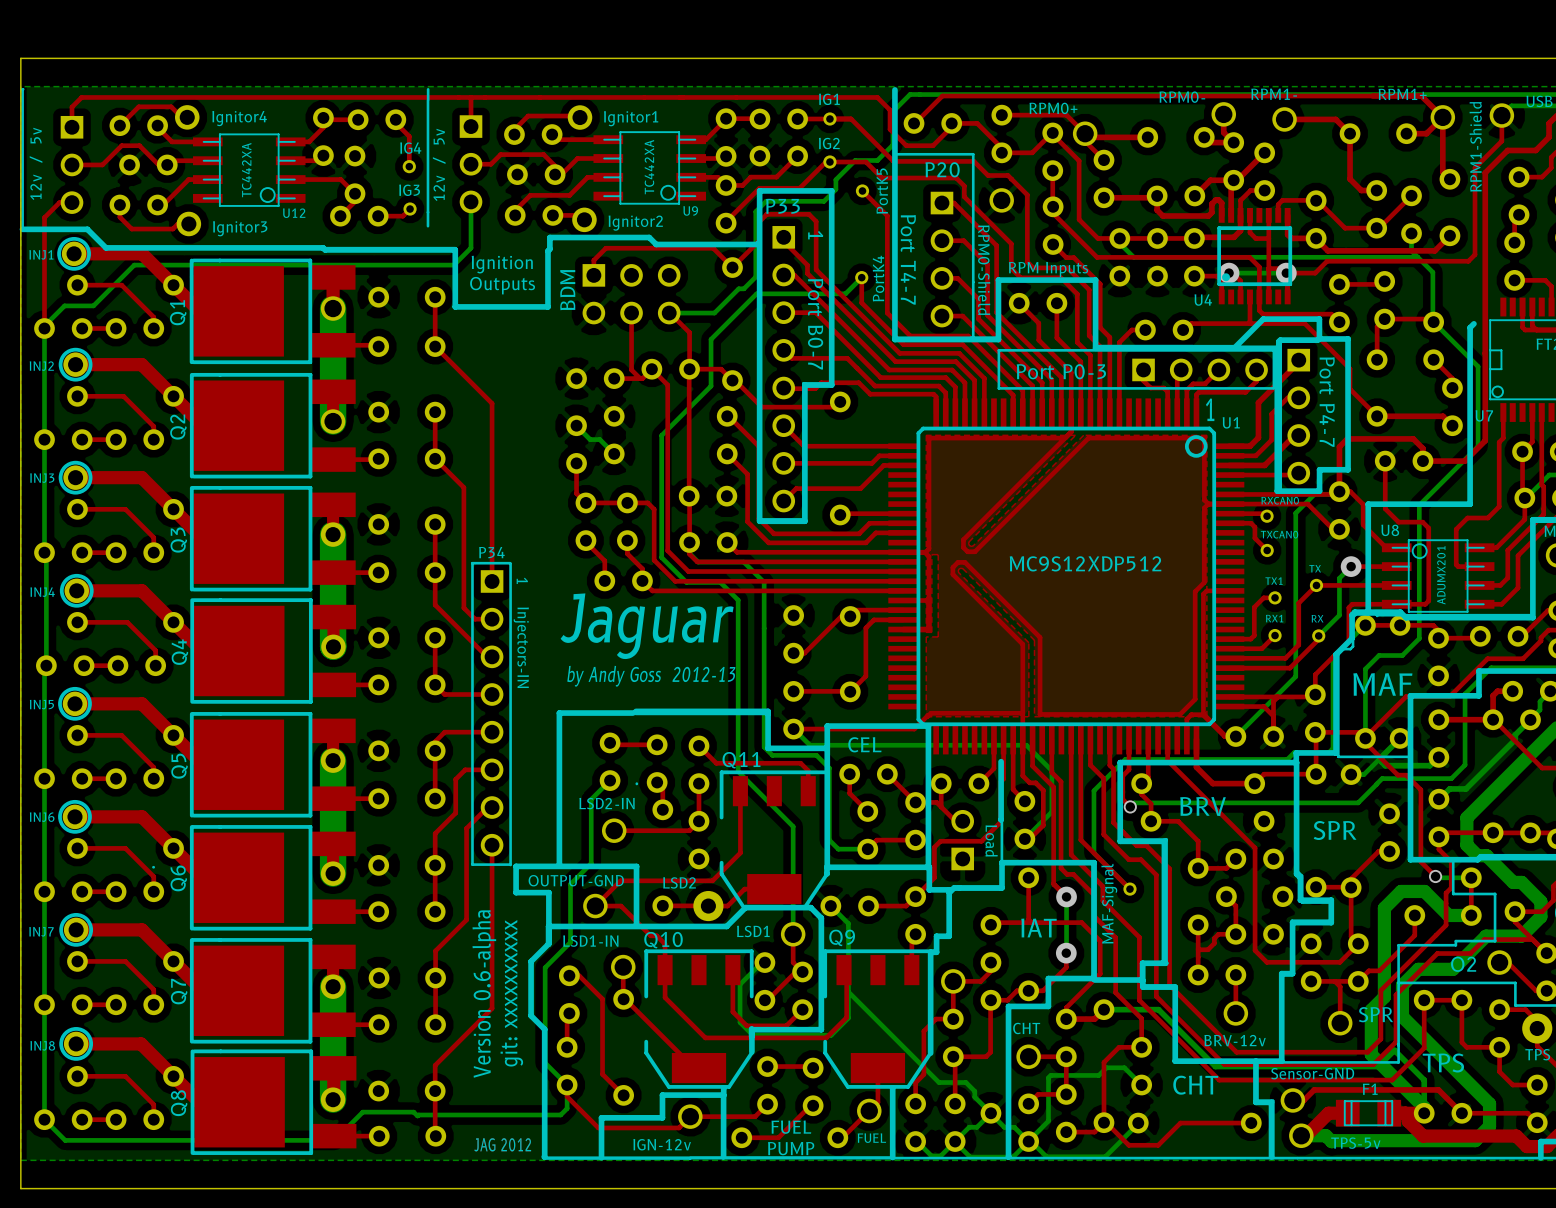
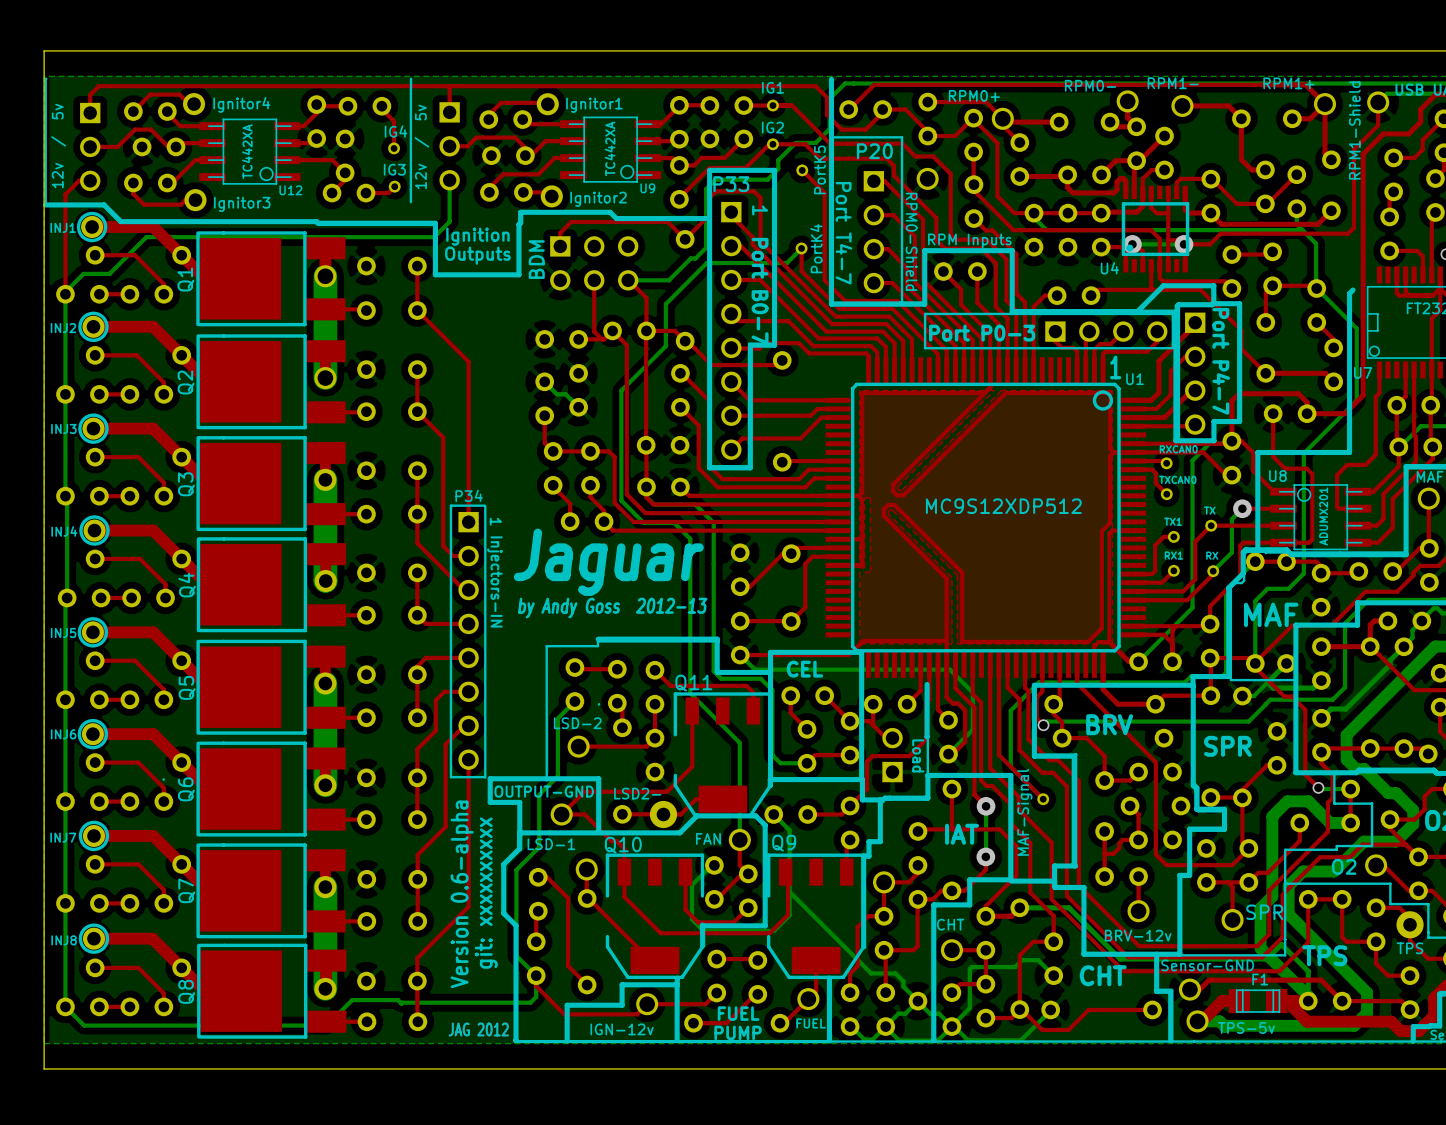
line: (632, 713) (559, 713) (559, 865) -> none
line: none -> (597, 641) (597, 646) (546, 646) (546, 780)
text: LSD2-IN (607, 803) -> LSD-2 (577, 723)
text: LSD2 (679, 882) -> LSD2- (637, 793)
text: LSD1 (753, 931) -> FAN (708, 838)
text: LSD1-IN (590, 941) -> LSD-1 (551, 844)

